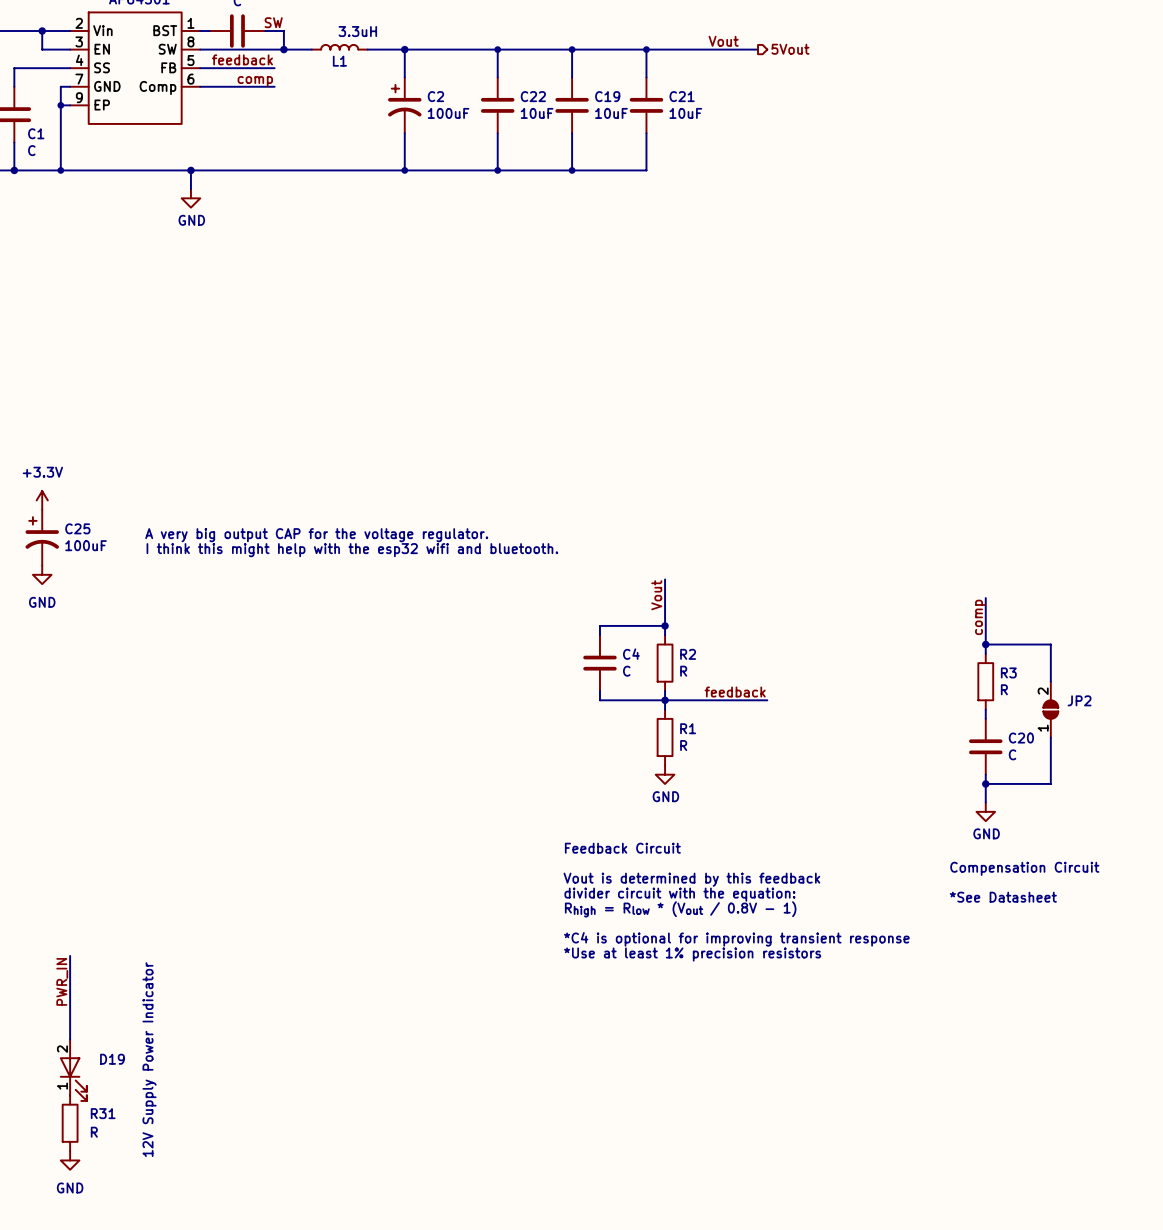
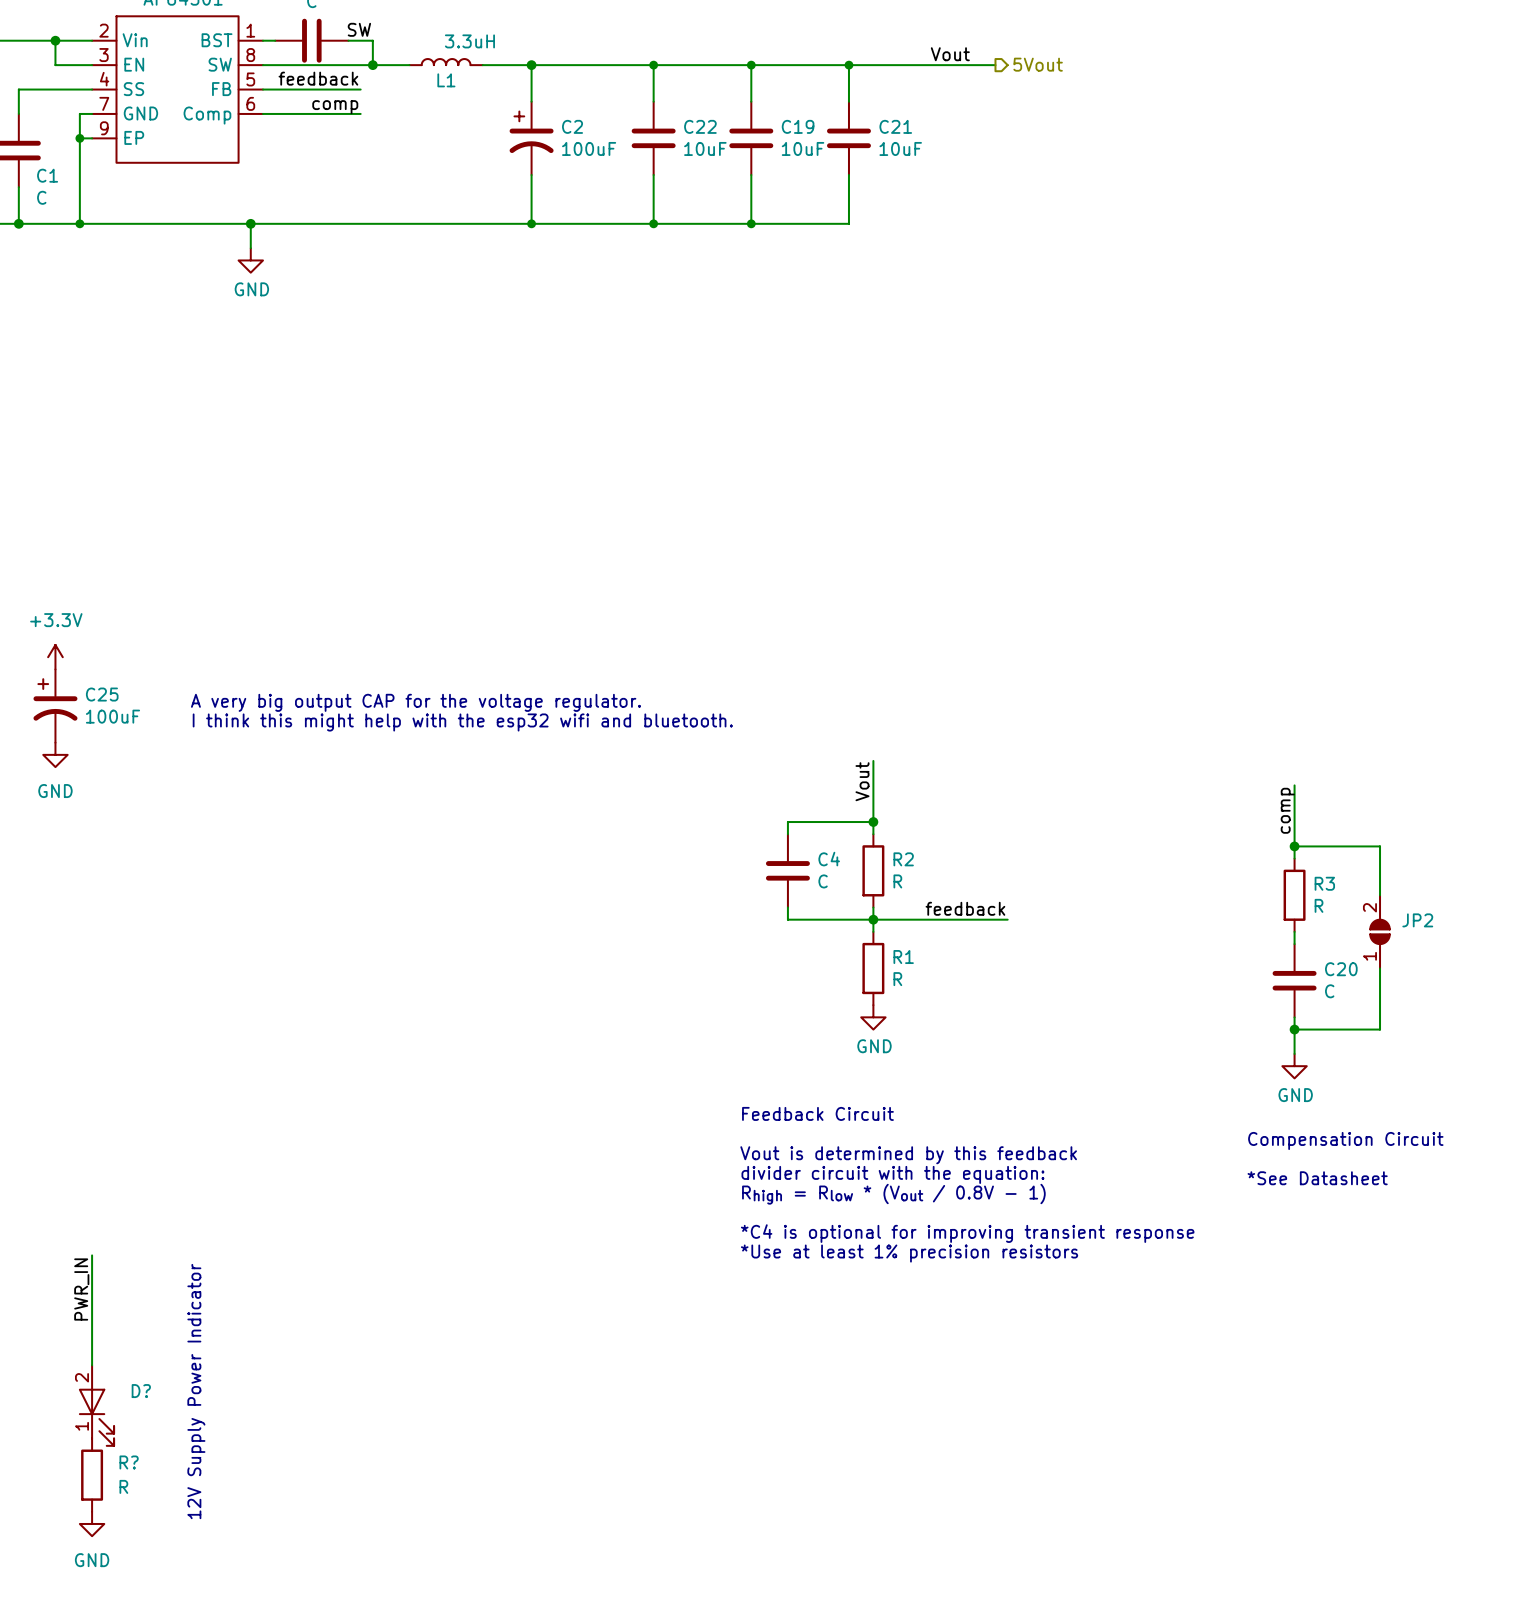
D19 name: D19 (112, 1059) -> D? (141, 1391)
R31 name: R31 (103, 1113) -> R? (129, 1462)

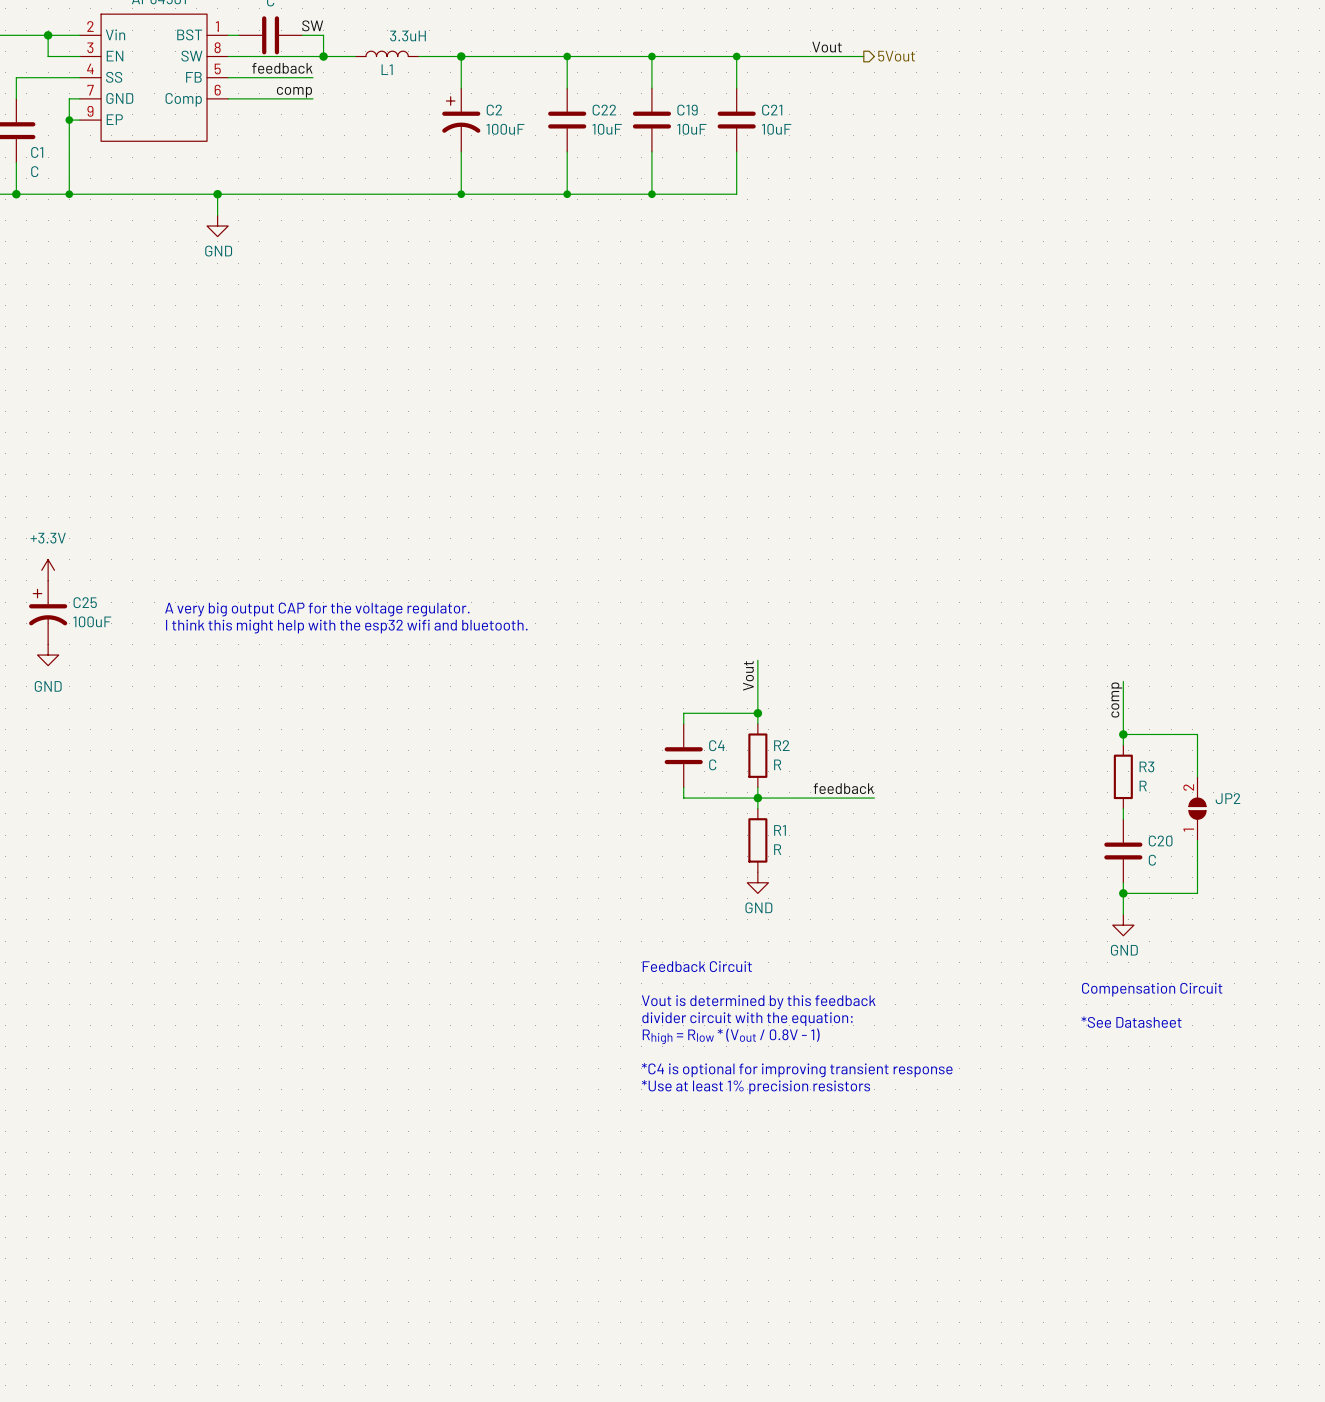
wire: (92, 1255) (92, 1365) -> none
label: PWR_IN (81, 1289) -> none
text: 12V Supply Power Indicator (196, 1391) -> none
D?: (96, 1405) -> none
R?: R (92, 1475) -> none
power symbol: GND (92, 1523) -> none

